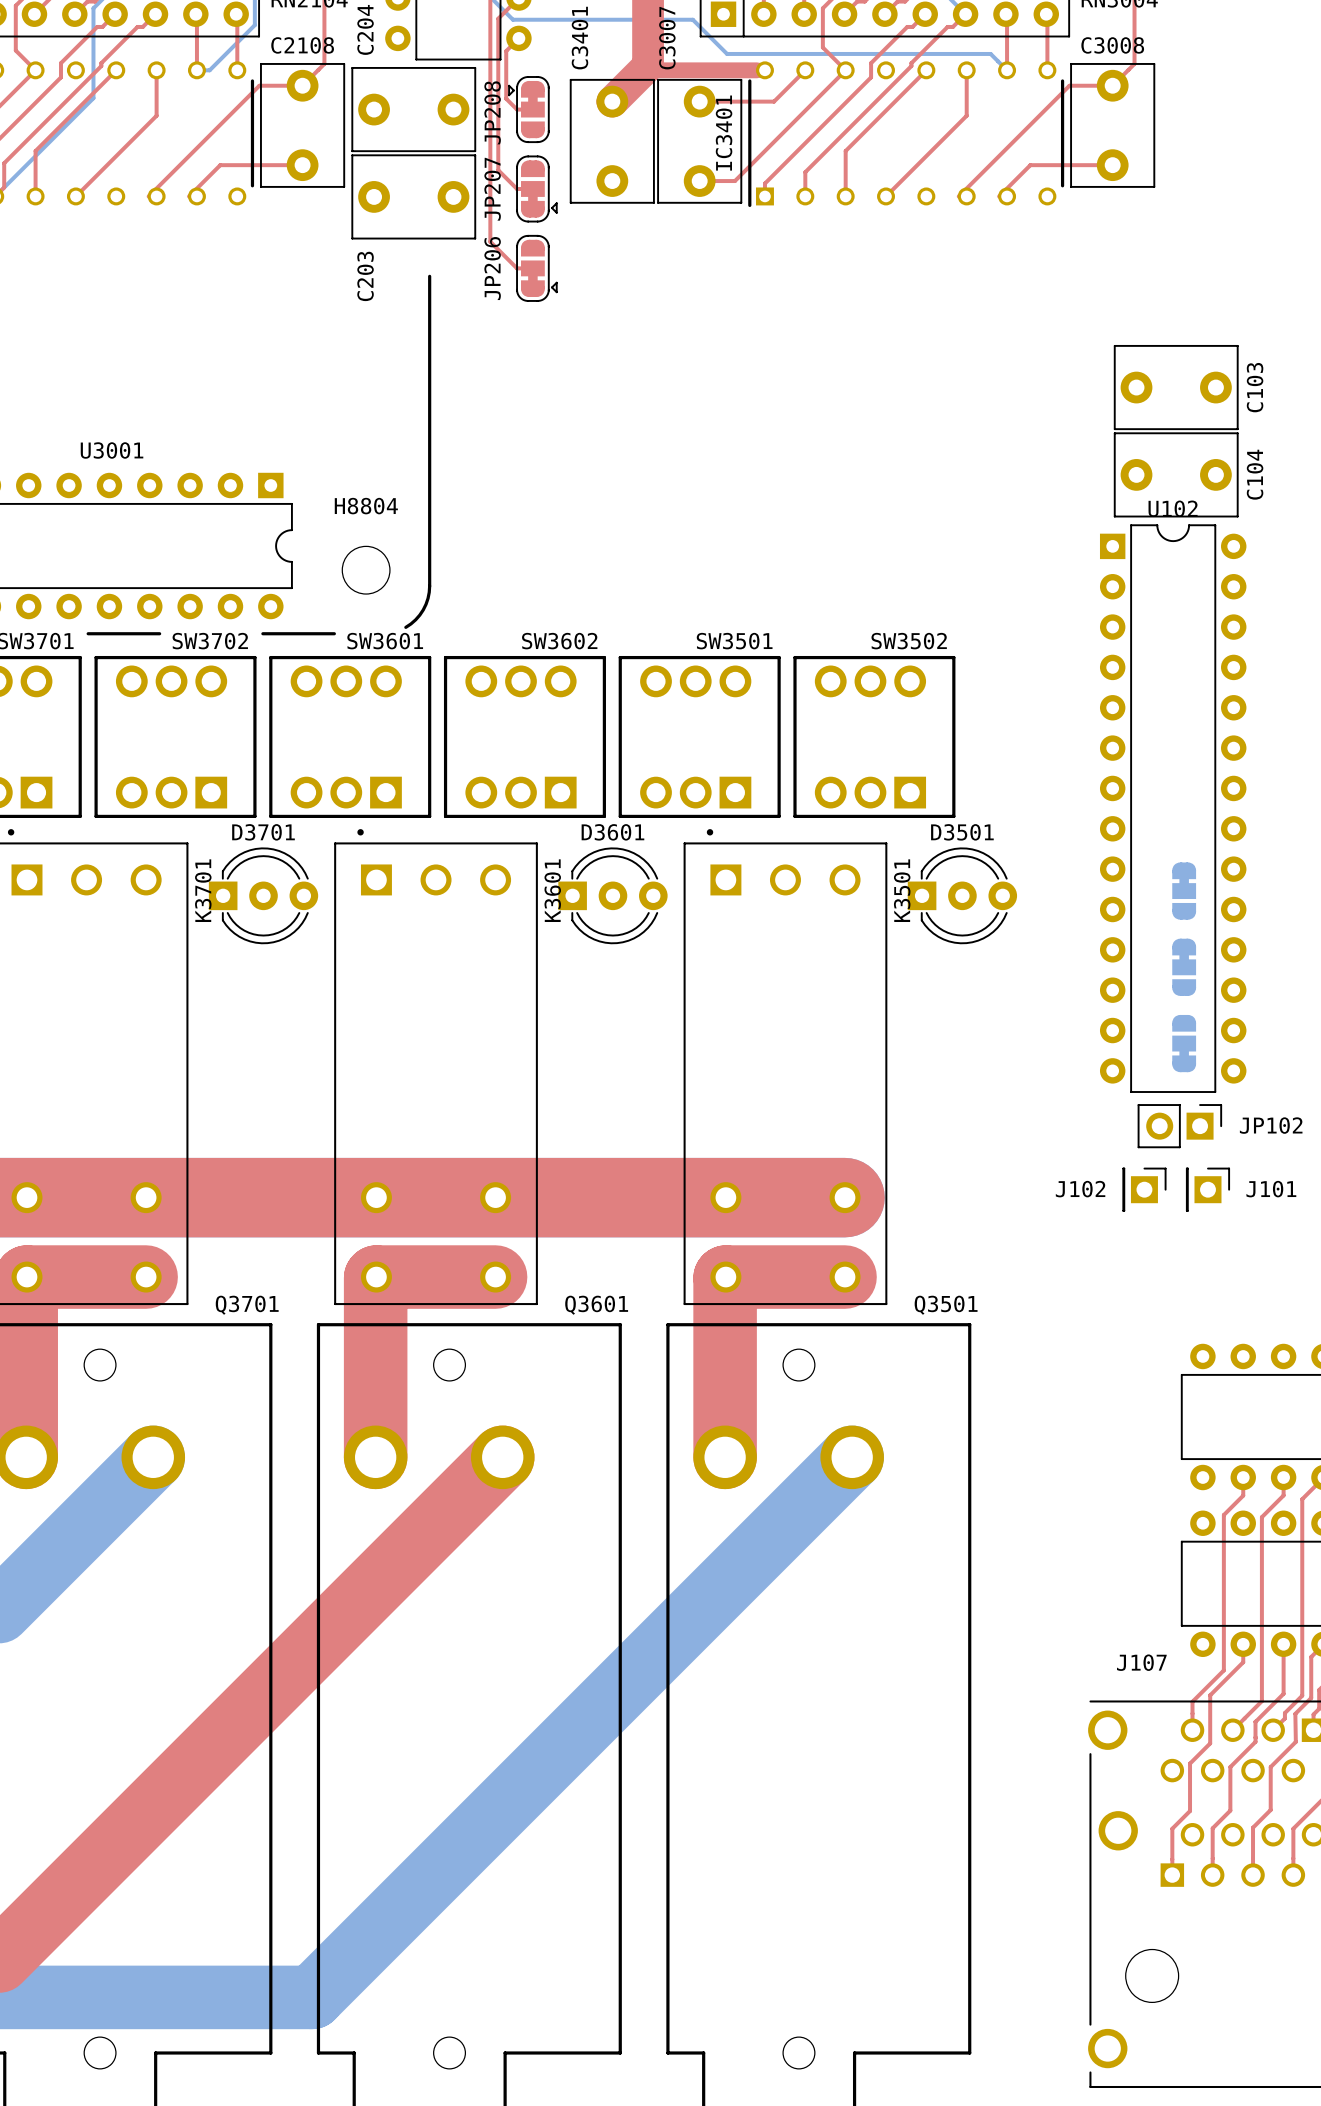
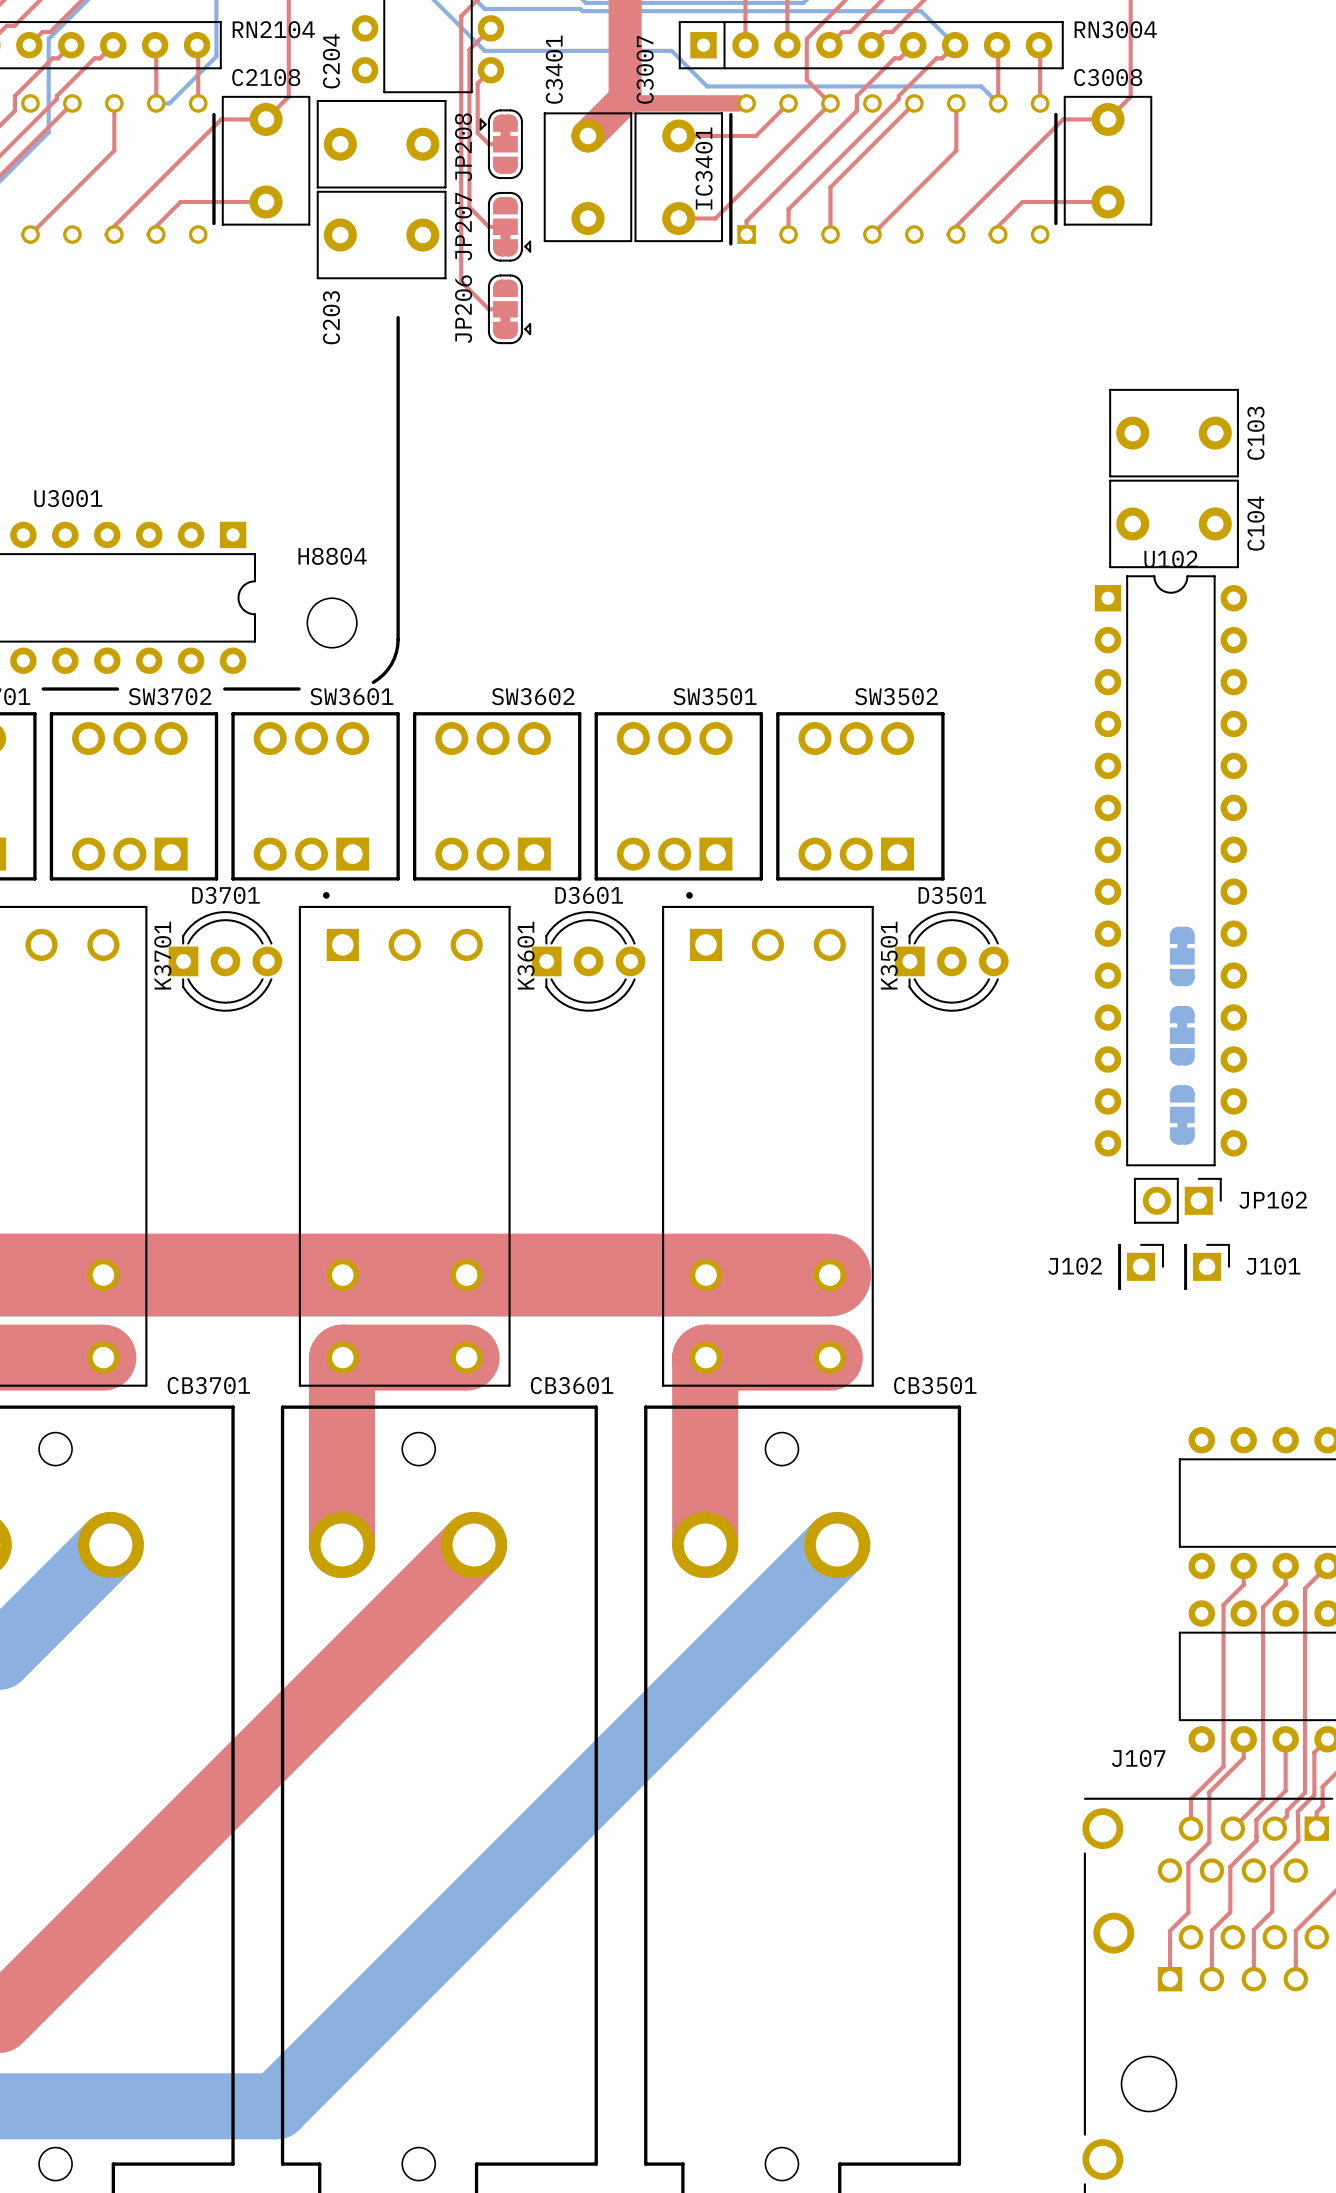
Q3701 name: Q3701 (247, 1305) -> CB3701 (208, 1385)
Q3601 name: Q3601 (596, 1305) -> CB3601 (572, 1385)
Q3501 name: Q3501 (946, 1305) -> CB3501 (935, 1385)

